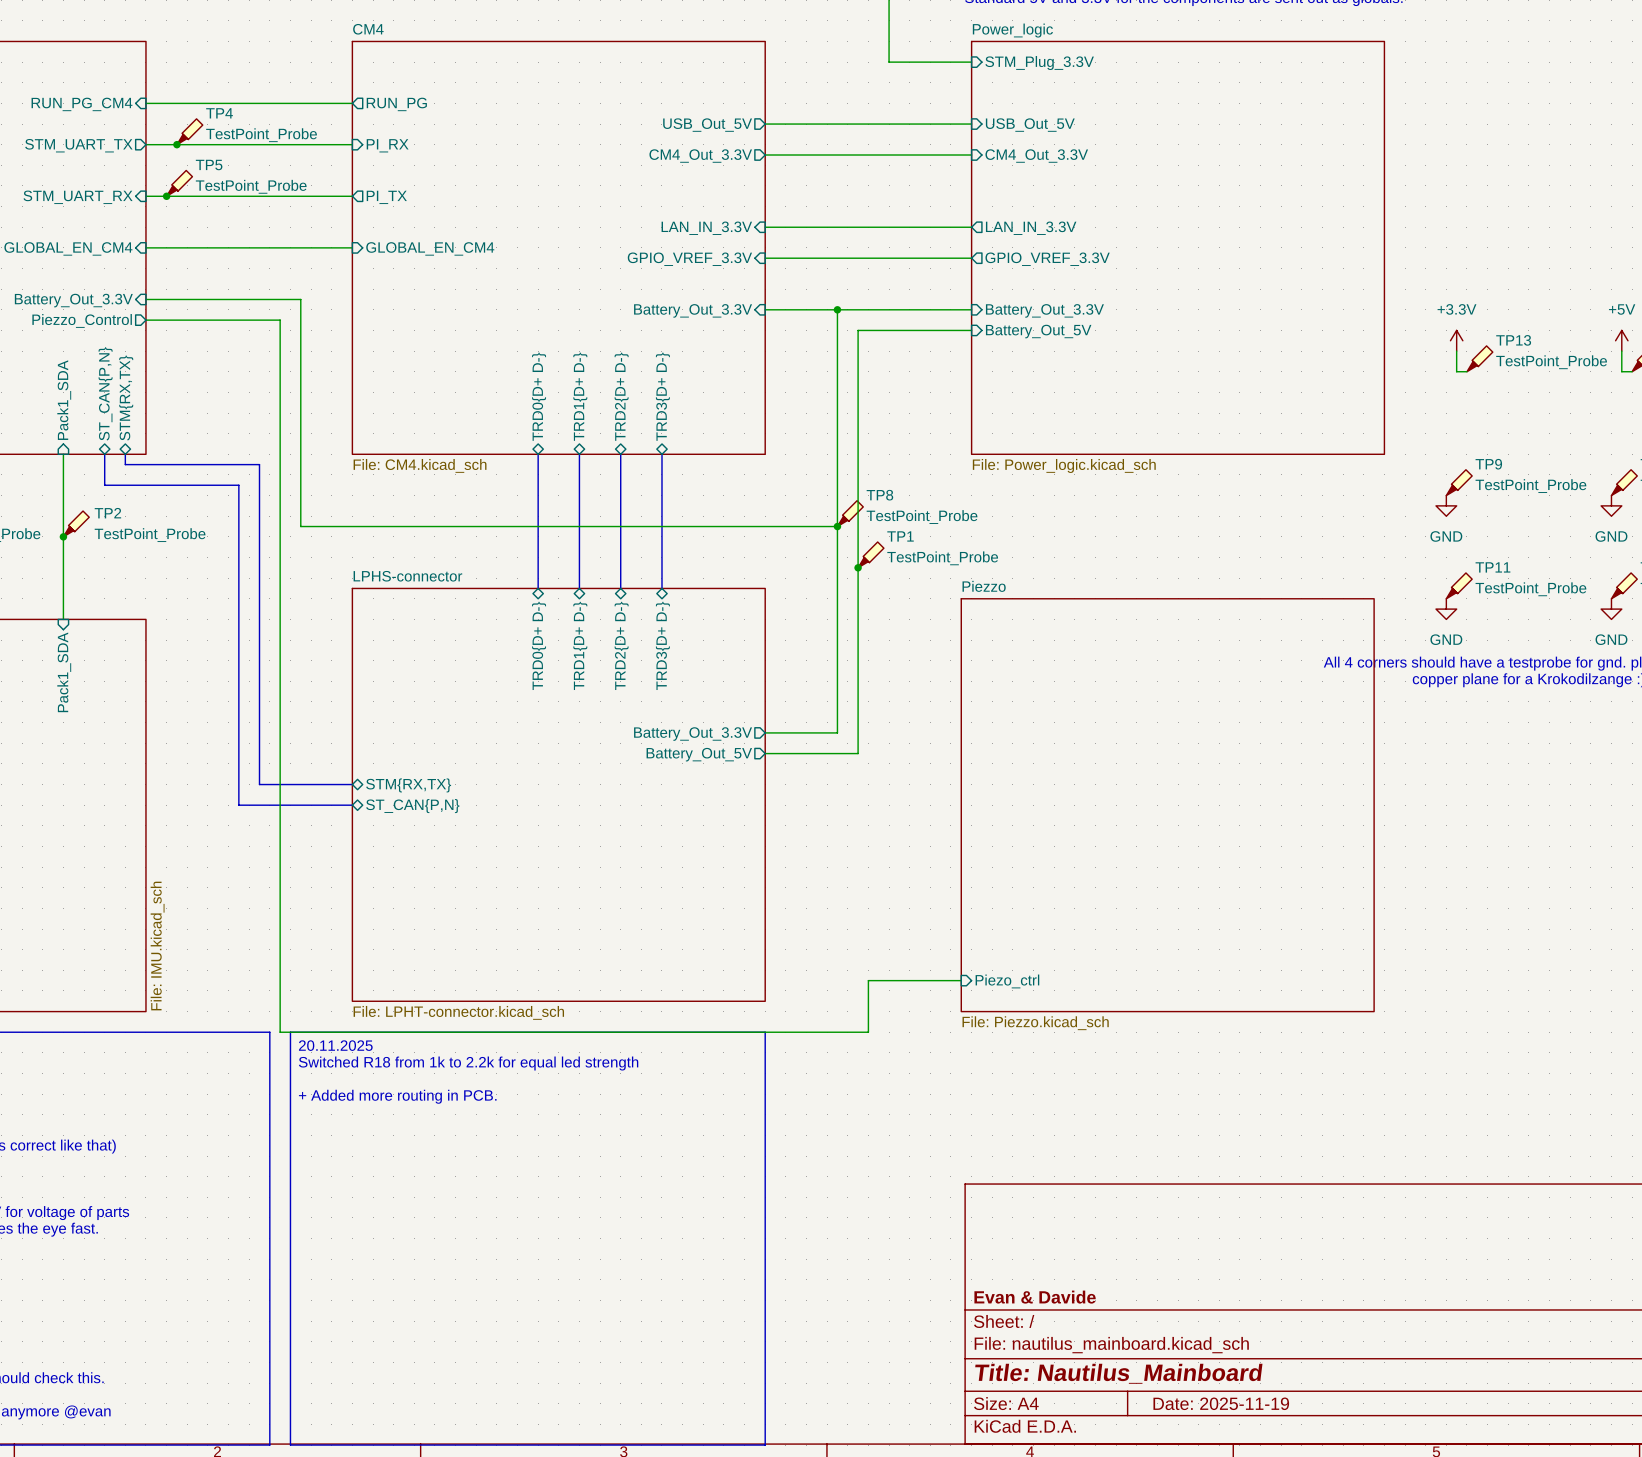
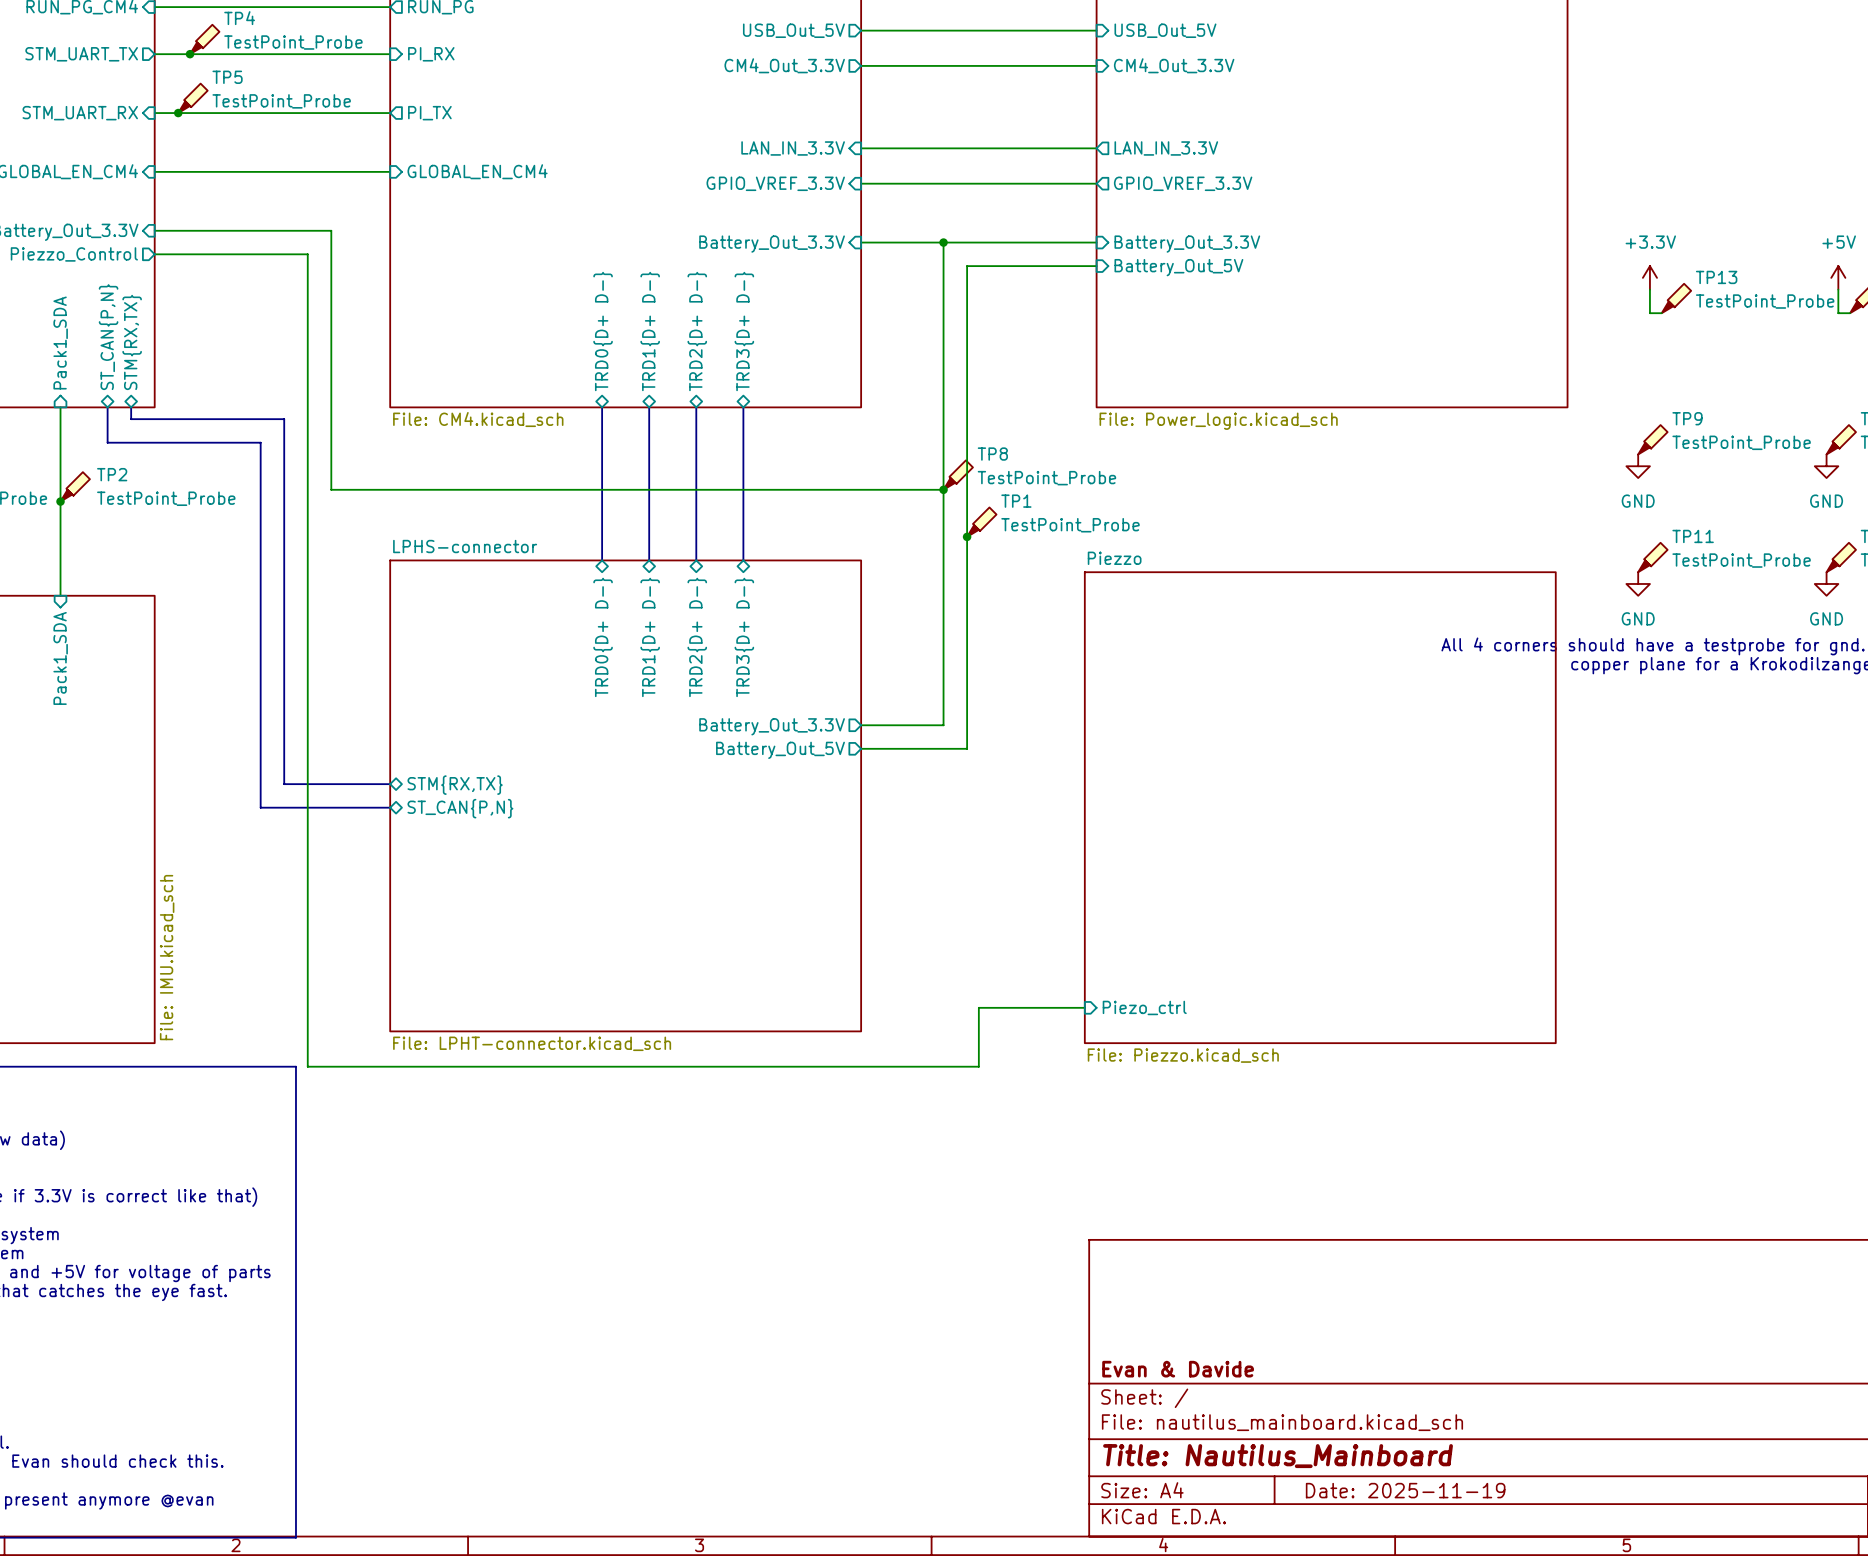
line: (290, 1032) (765, 1032) (765, 1445) (290, 1445) (290, 1032) -> none
text: 20.11.2025 (335, 1045) -> none
text: Switched R18 from 1k to 2.2k for equal led strength (468, 1063) -> none
text: + Added more routing in PCB. (397, 1096) -> none

